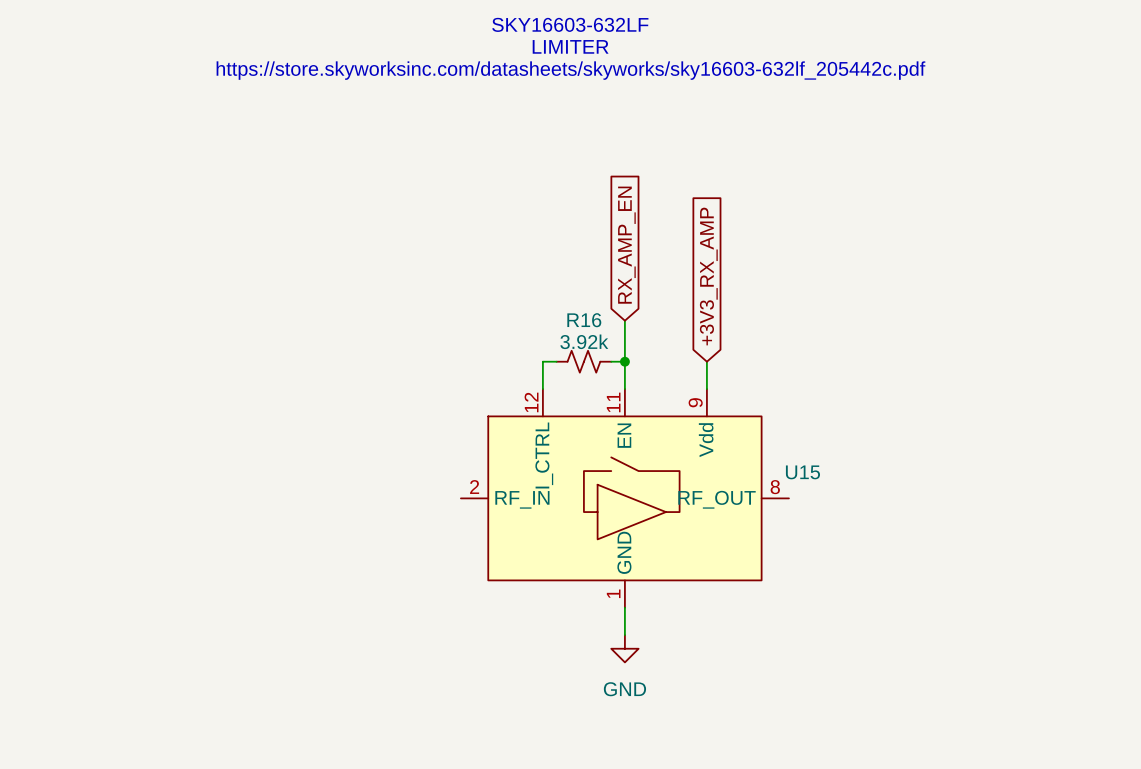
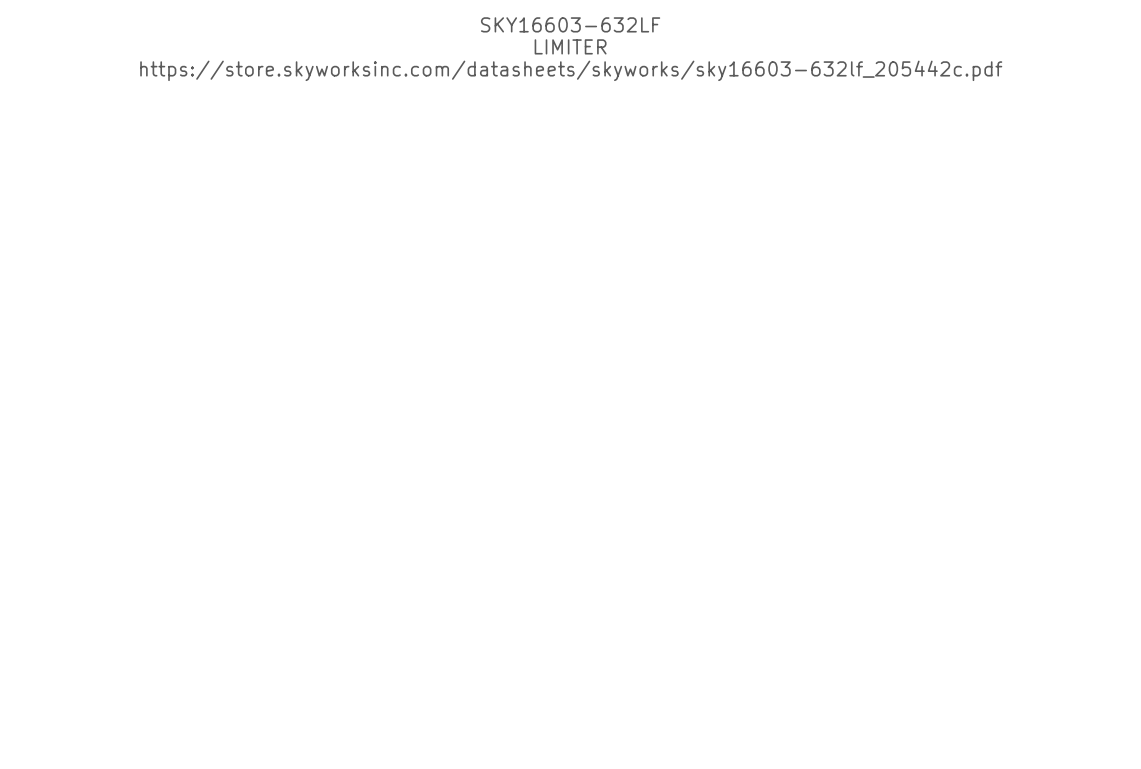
global label: RX_AMP_EN (626, 245) -> none
global label: +3V3_RX_AMP (708, 276) -> none
wire: (624, 320) (624, 389) -> none
wire: (556, 361) (542, 361) (542, 389) -> none
R16: 3.92k (583, 361) -> none
wire: (611, 361) (624, 361) -> none
junction: (624, 361) -> none
wire: (706, 361) (706, 389) -> none
U15: (624, 498) -> none
wire: (624, 607) (624, 635) -> none
power symbol: GND (624, 648) -> none

